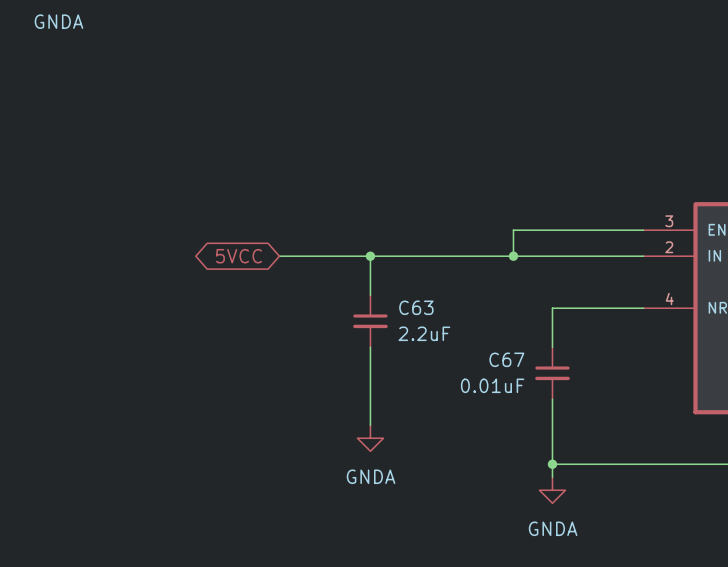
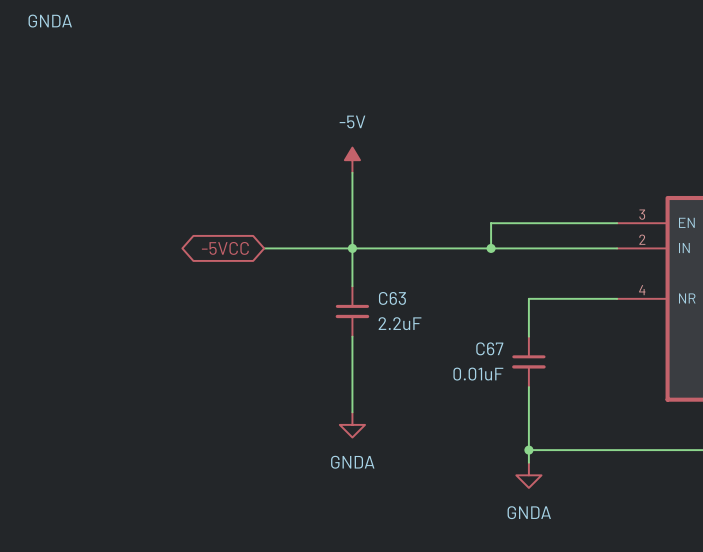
power symbol: none -> -5V (352, 160)
wire: none -> (352, 172) (352, 248)
global label: 5VCC (238, 256) -> -5VCC (225, 248)

